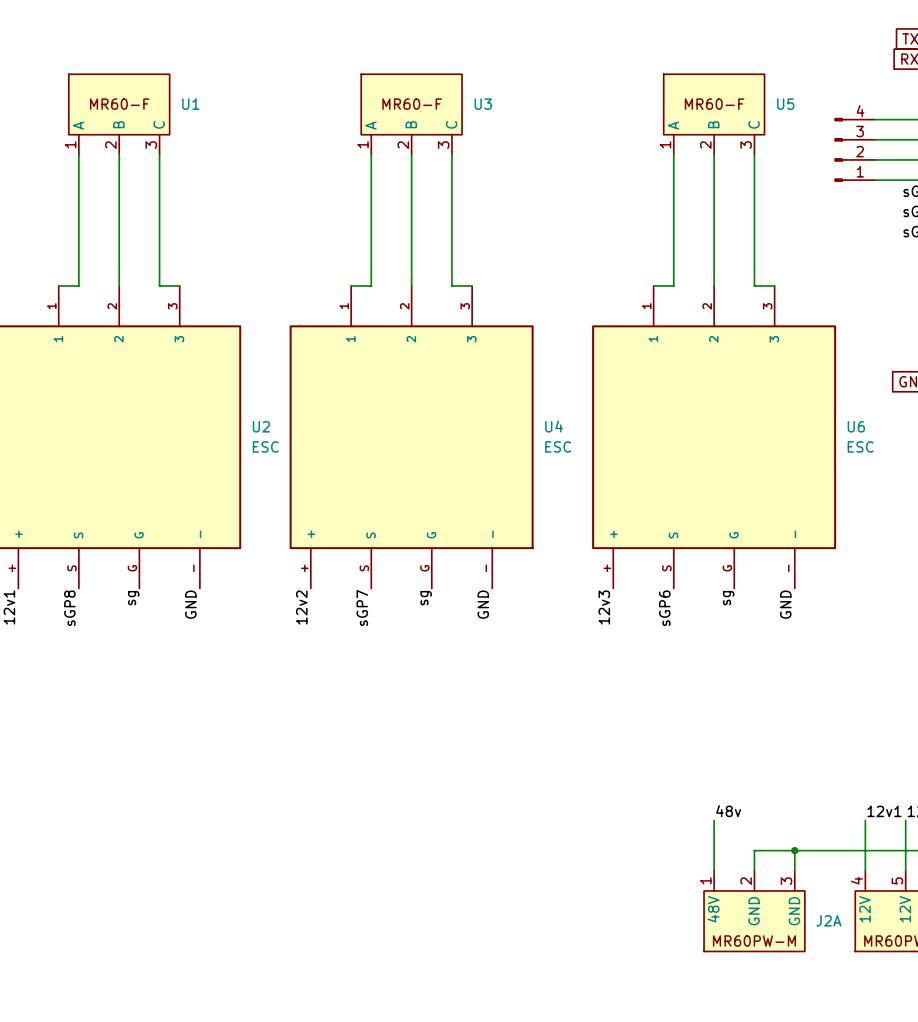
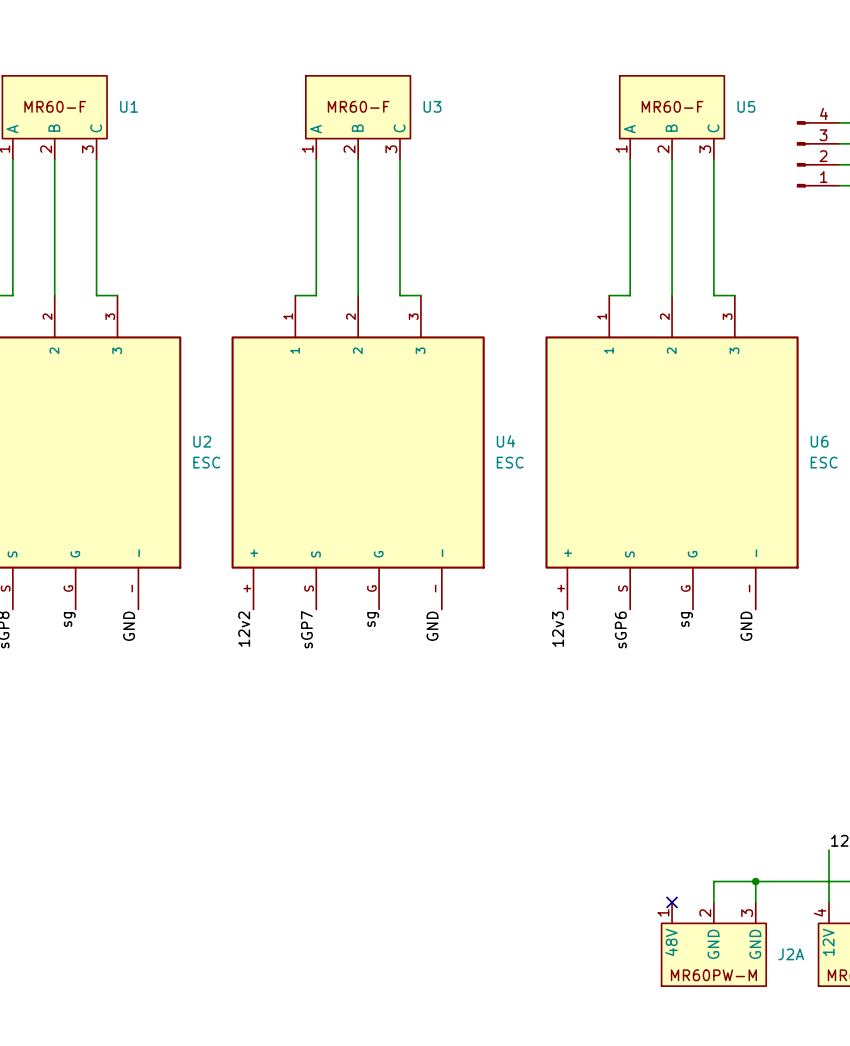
label: 48v (728, 811) -> none
wire: (714, 820) (714, 870) -> none
no-connect mark: none -> (672, 902)

